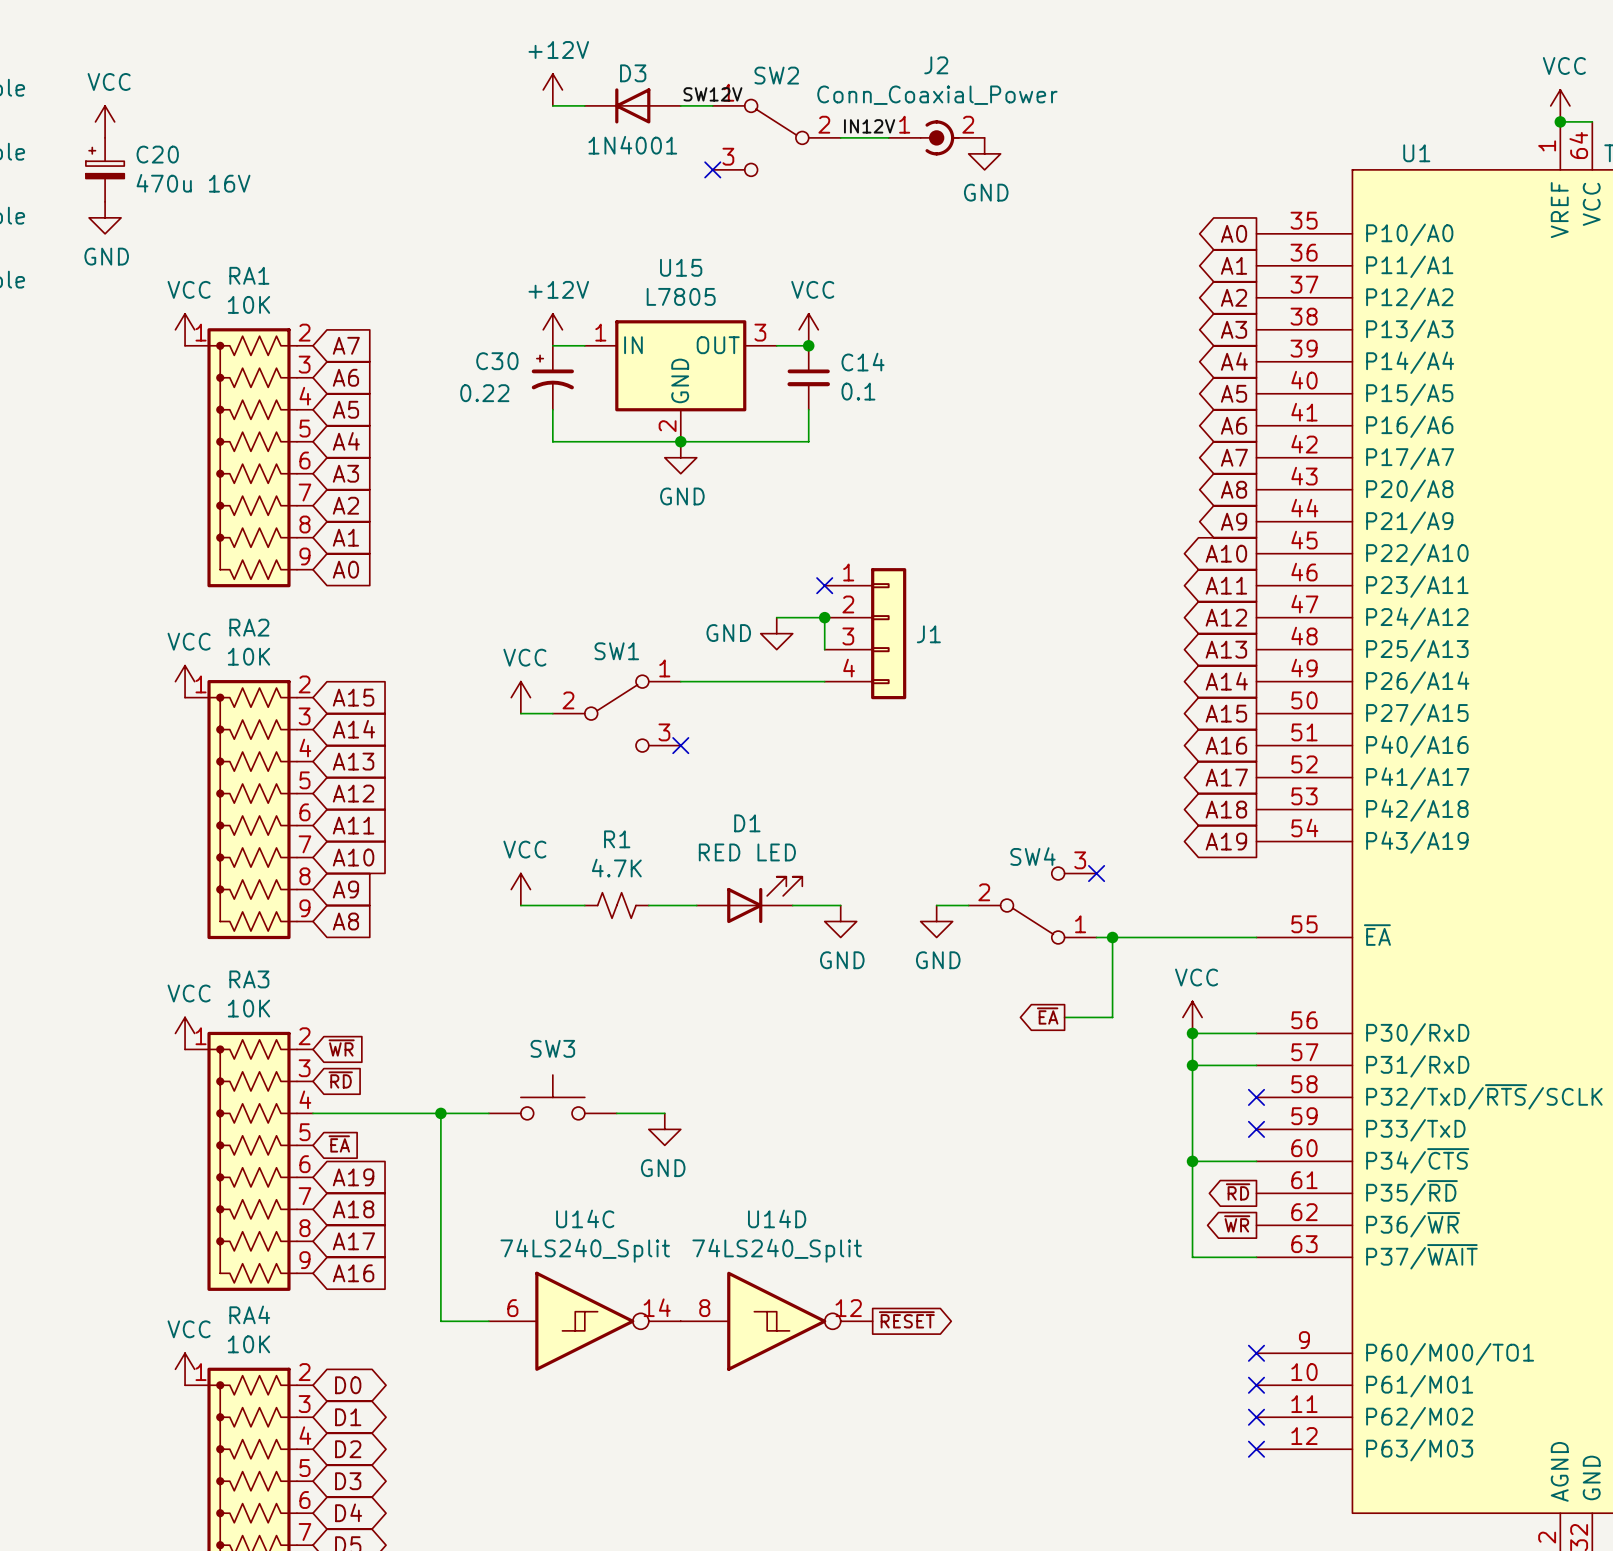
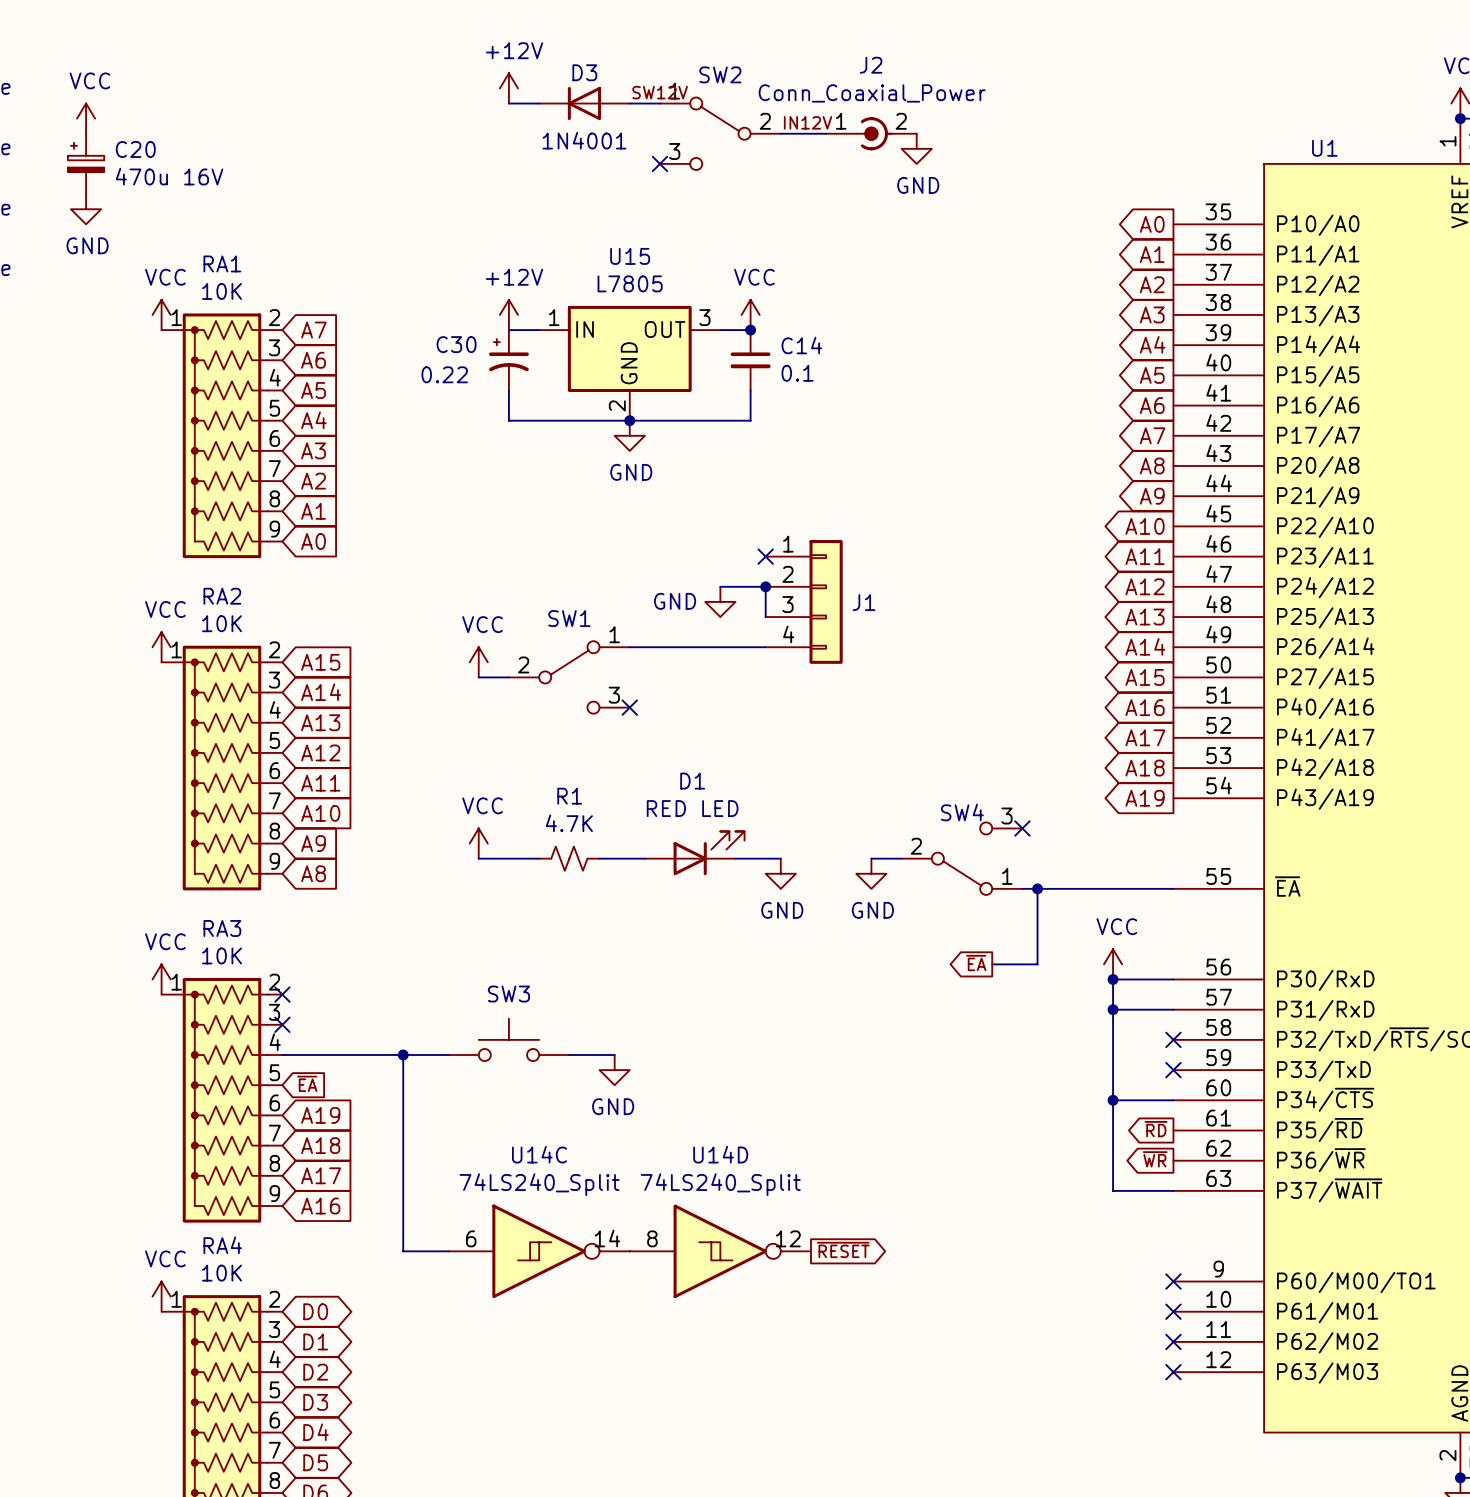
global label: ~{WR} (341, 1048) -> none
no-connect mark: none -> (282, 994)
global label: ~{RD} (340, 1079) -> none
no-connect mark: none -> (282, 1024)

